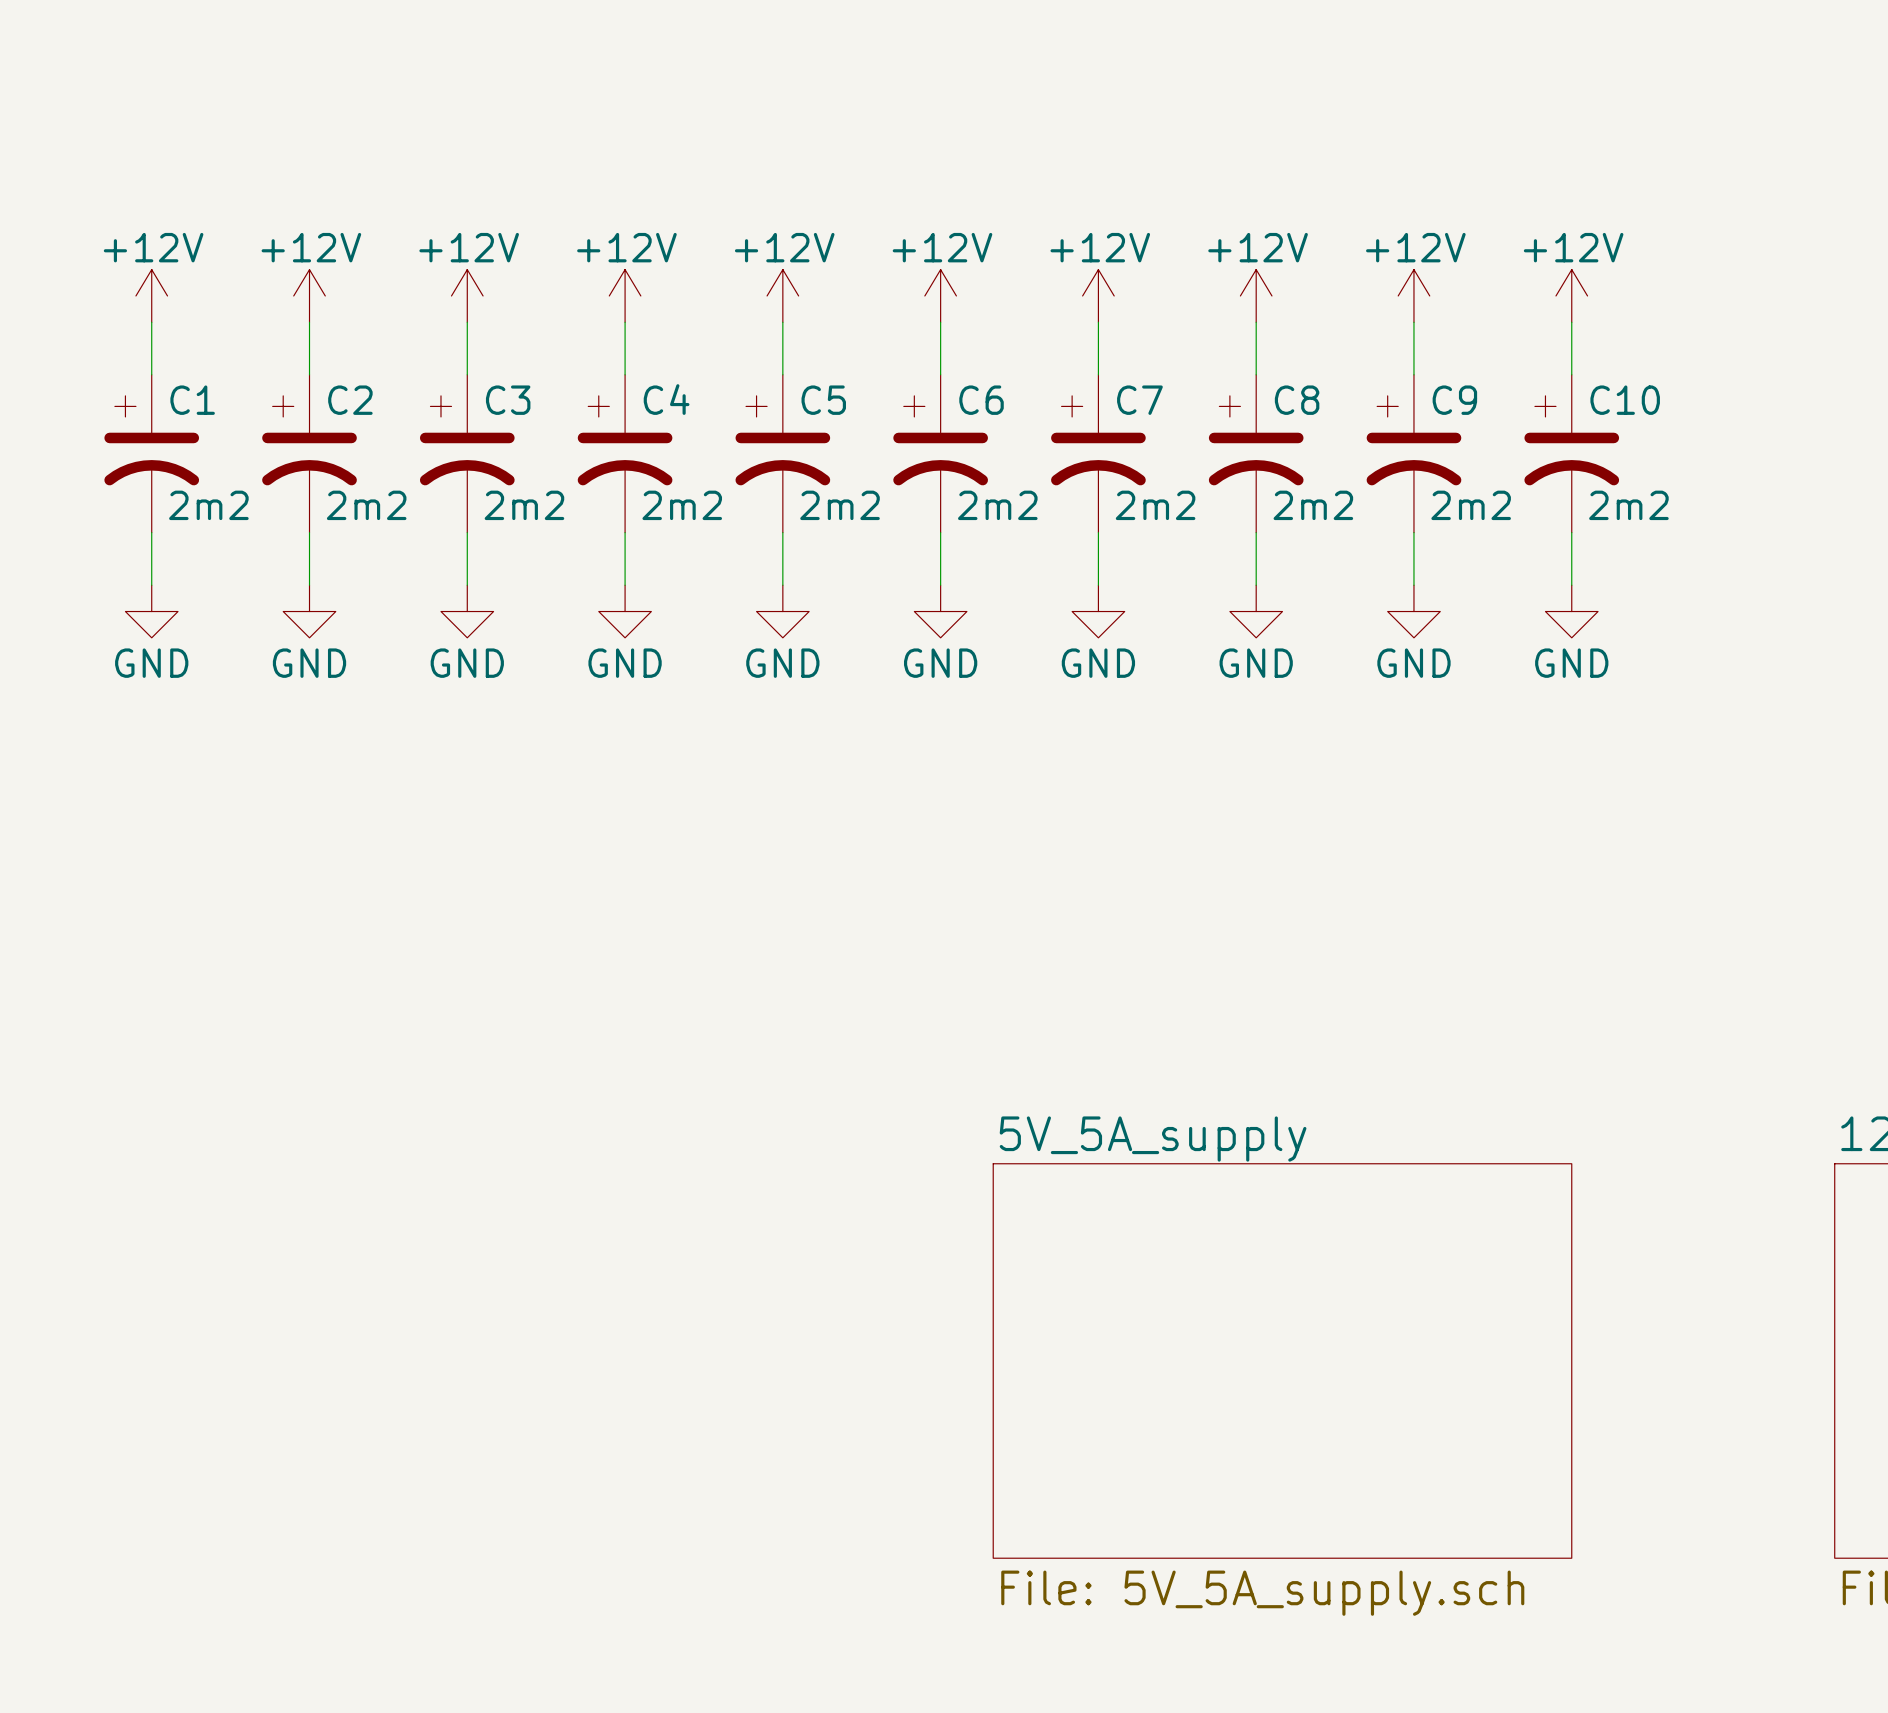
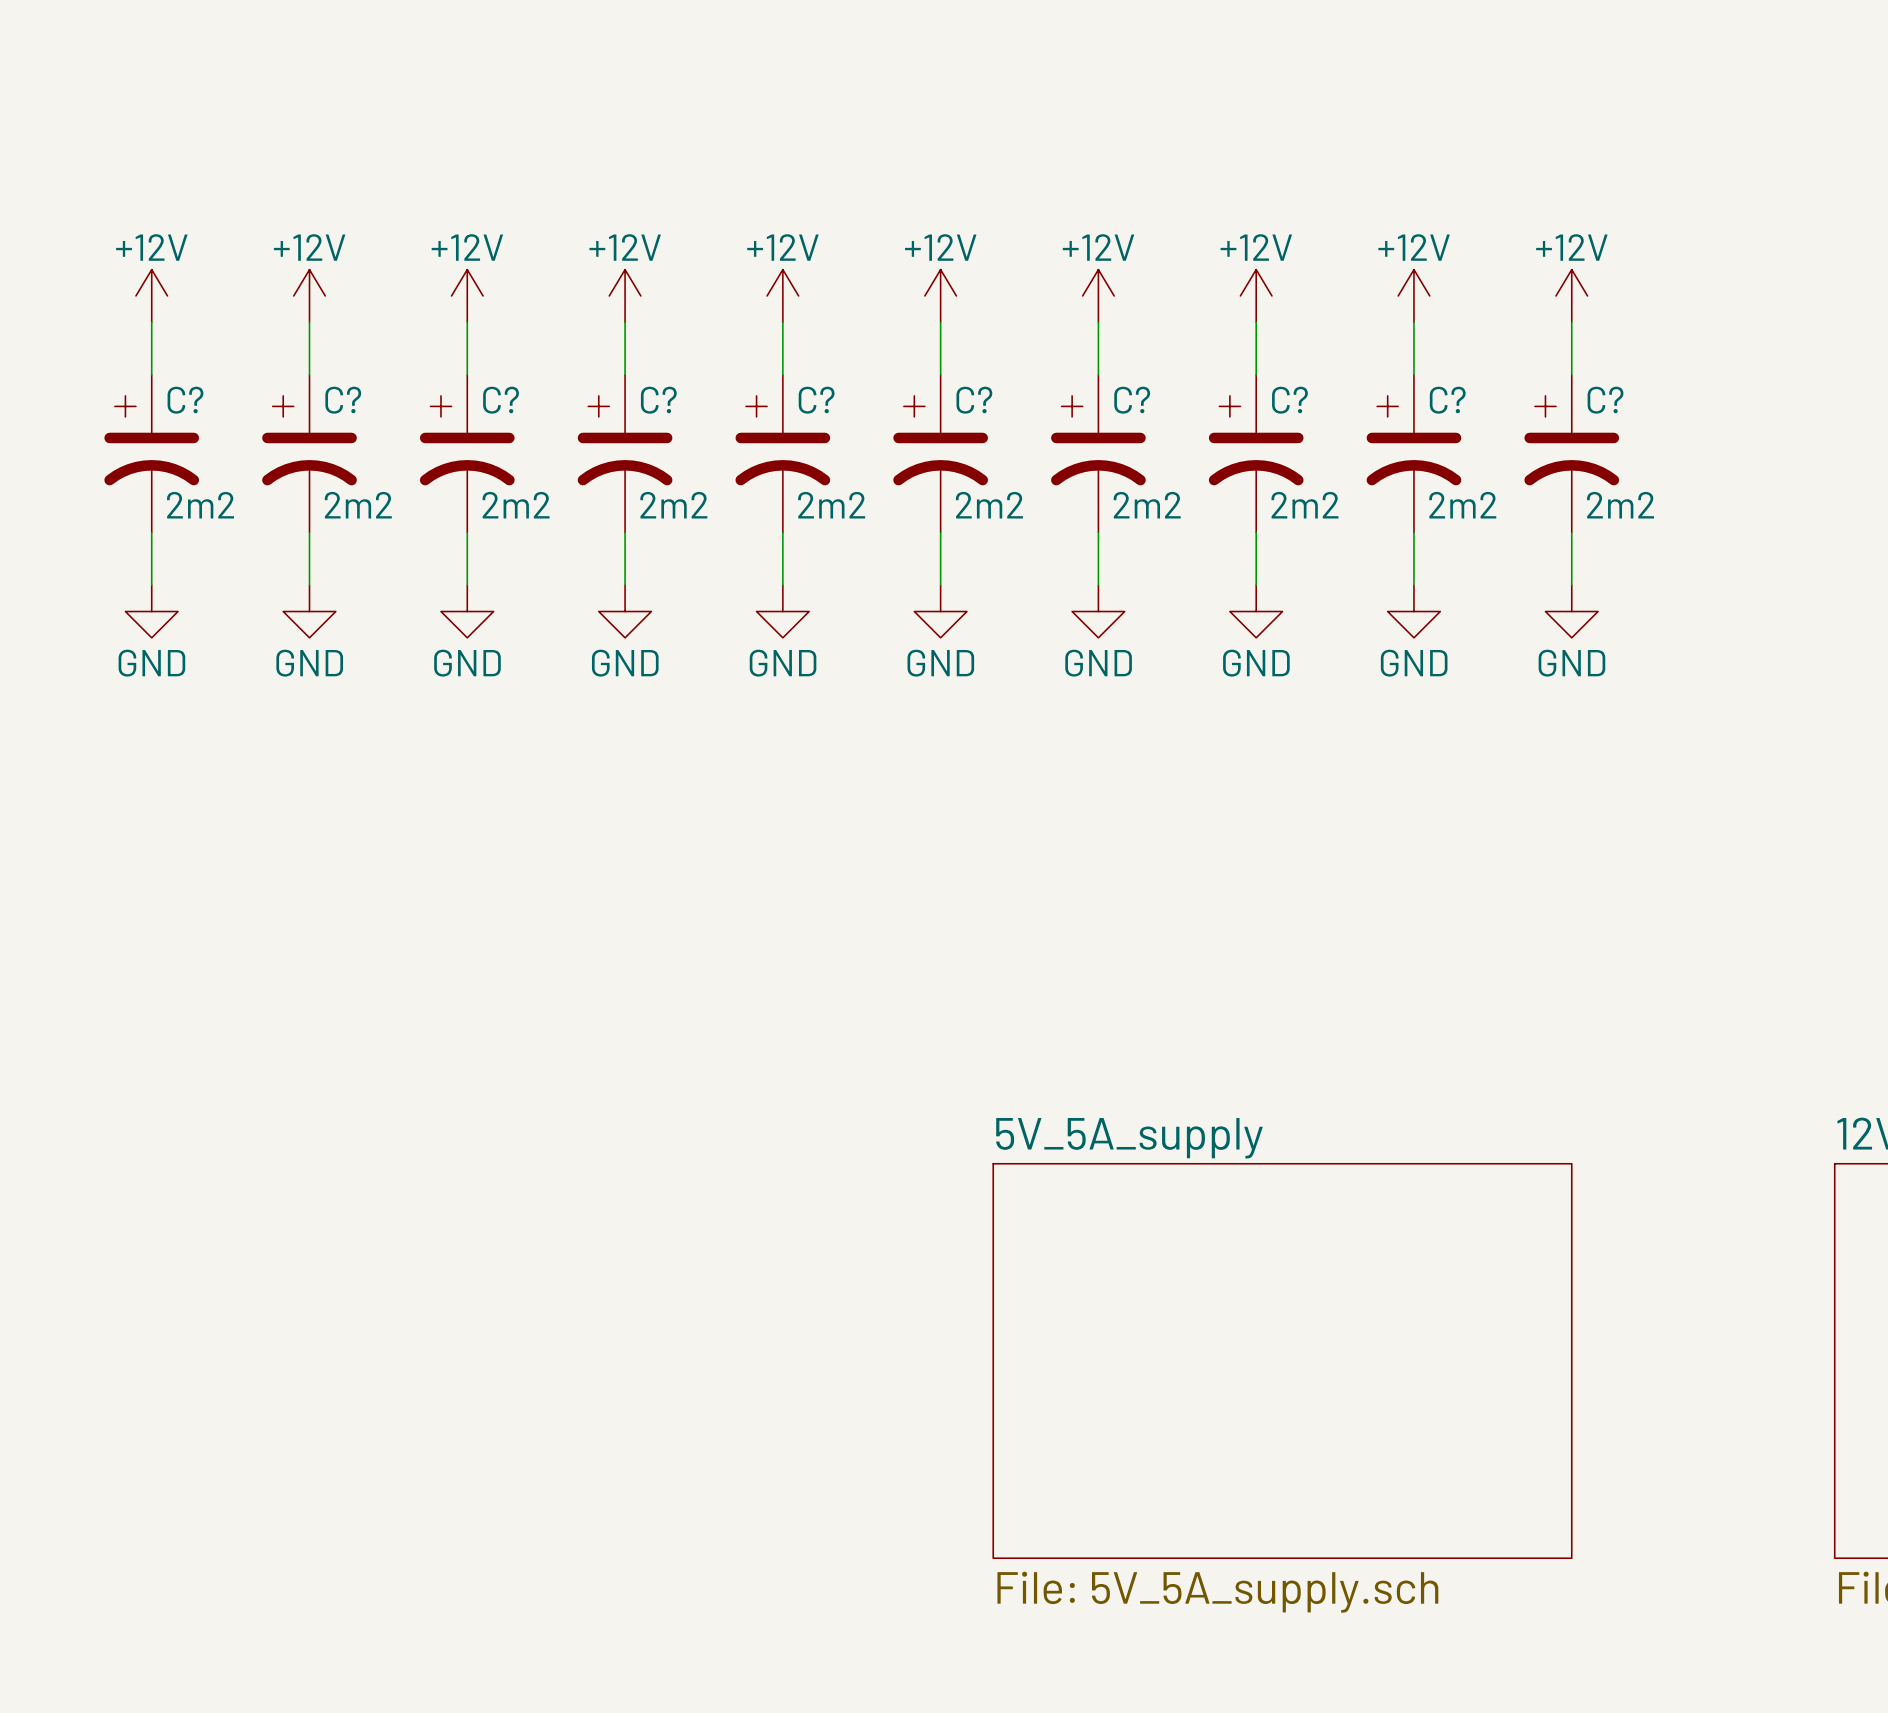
C4 name: C4 (666, 399) -> C? (658, 400)
C1 name: C1 (192, 400) -> C? (185, 400)
C2 name: C2 (350, 400) -> C? (343, 400)
C3 name: C3 (508, 400) -> C? (501, 400)
C5 name: C5 (823, 400) -> C? (816, 400)
C6 name: C6 (981, 400) -> C? (974, 400)
C7 name: C7 (1139, 400) -> C? (1132, 400)
C8 name: C8 (1297, 400) -> C? (1289, 400)
C9 name: C9 (1454, 400) -> C? (1447, 400)
C10 name: C10 (1625, 400) -> C? (1605, 400)

